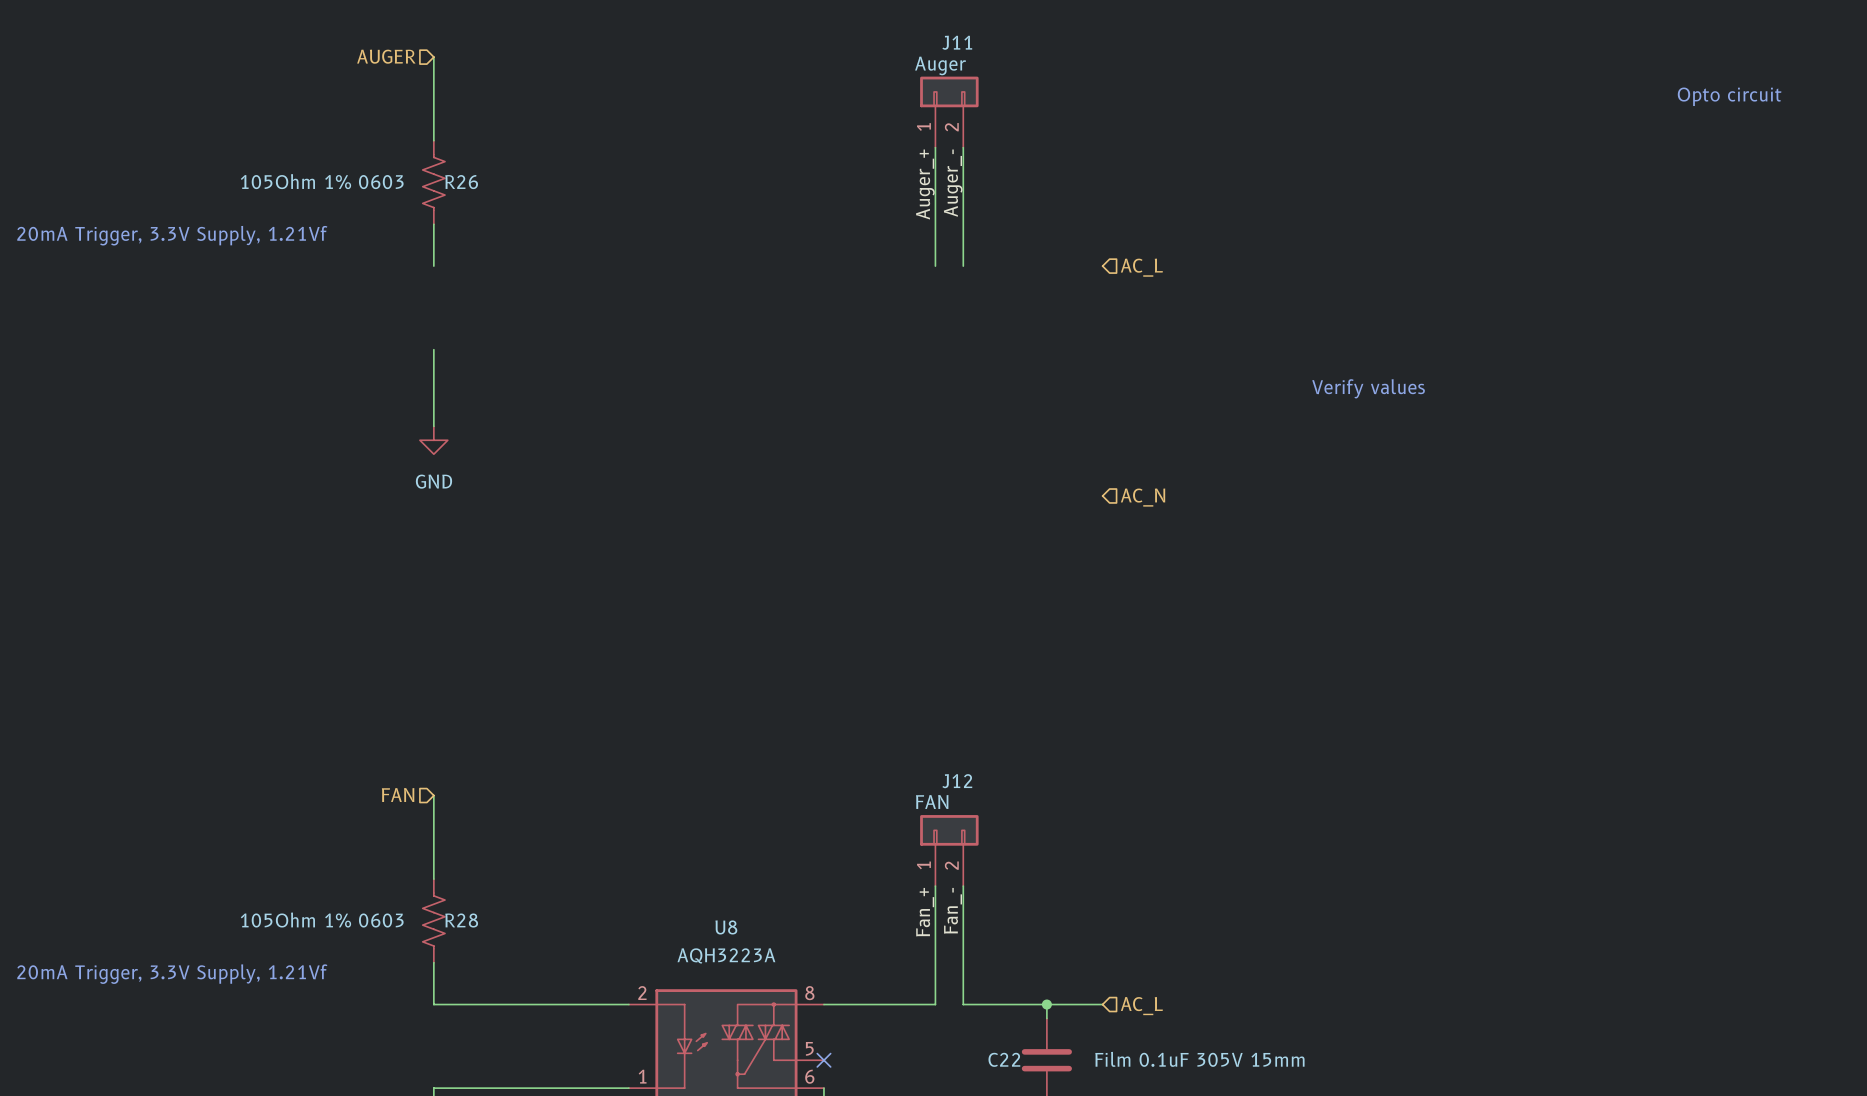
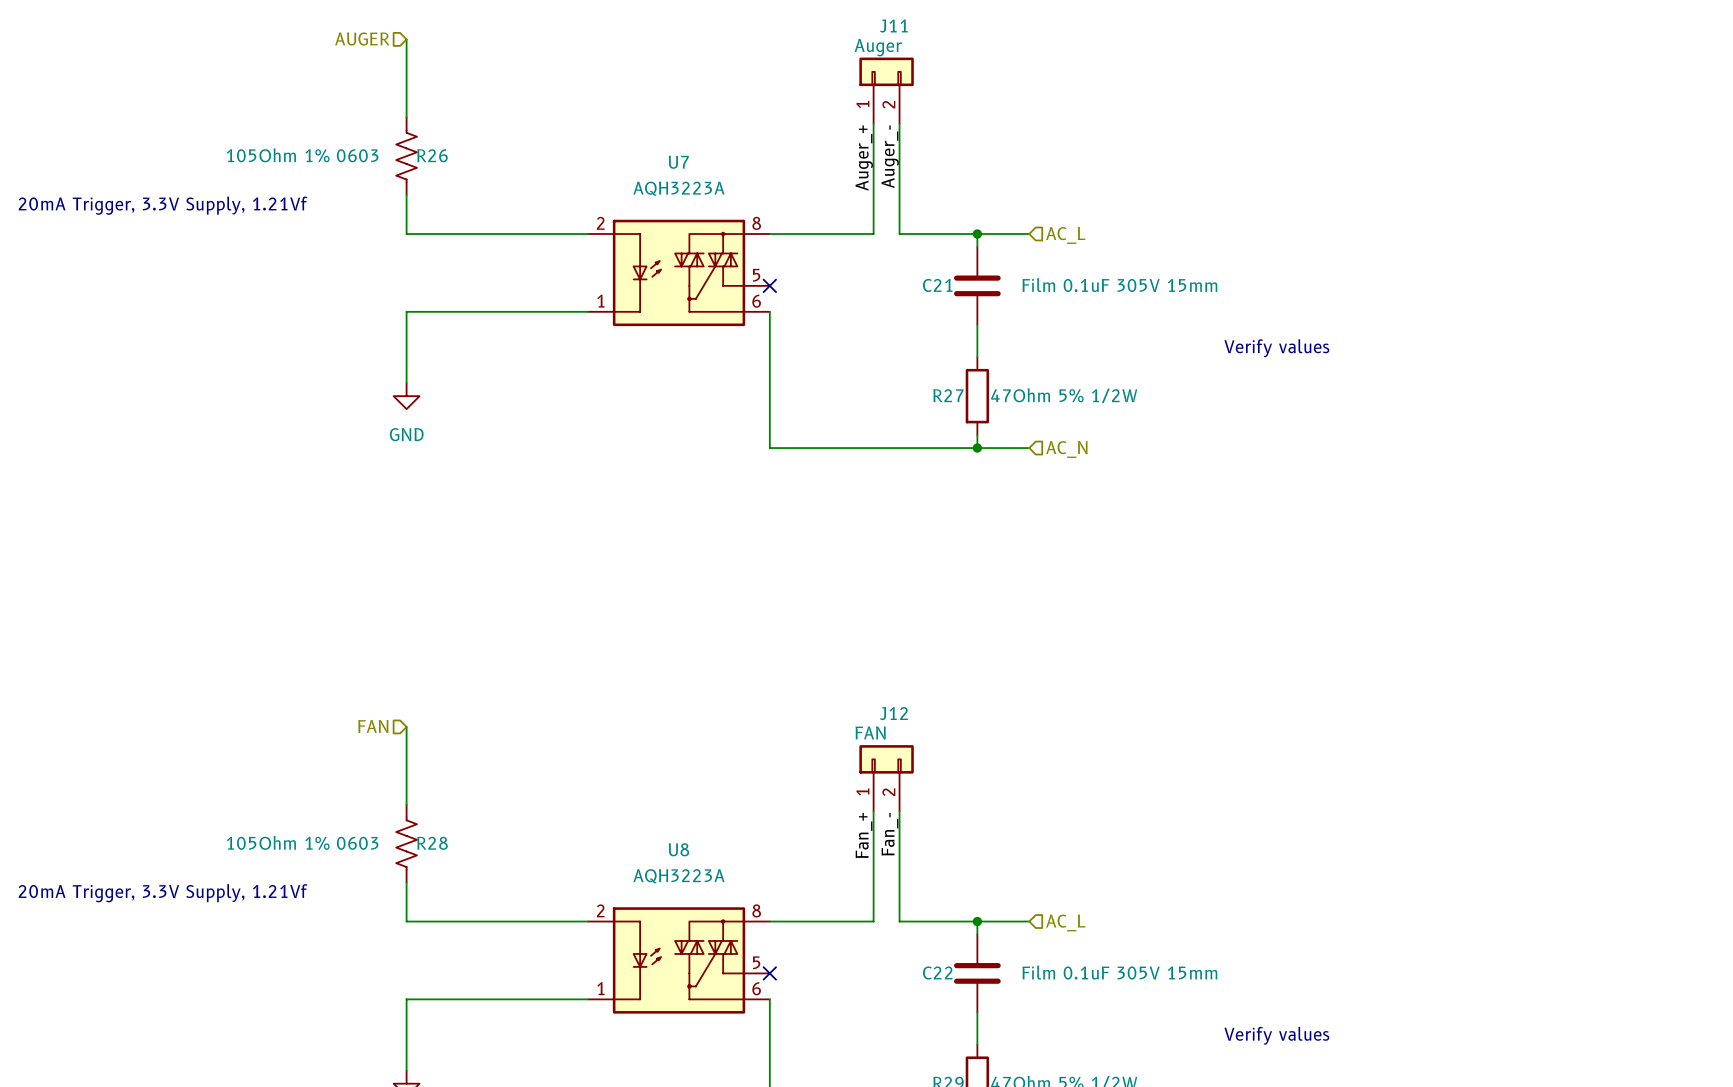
text: Opto circuit (1729, 96) -> none
wire: none -> (406, 234) (588, 234)
wire: none -> (769, 234) (873, 234)
wire: none -> (899, 234) (1029, 234)
wire: none -> (977, 234) (977, 246)
junction: none -> (977, 234)
U7: none -> AQH3223A (679, 272)
no-connect mark: none -> (769, 285)
C21: none -> Film 0.1uF 305V 15mm (977, 285)
wire: none -> (406, 311) (588, 311)
wire: none -> (769, 311) (769, 448) (1029, 448)
wire: none -> (977, 324) (977, 357)
R27: none -> 47Ohm 5% 1/2W (977, 396)
wire: none -> (977, 435) (977, 448)
junction: none -> (977, 448)

